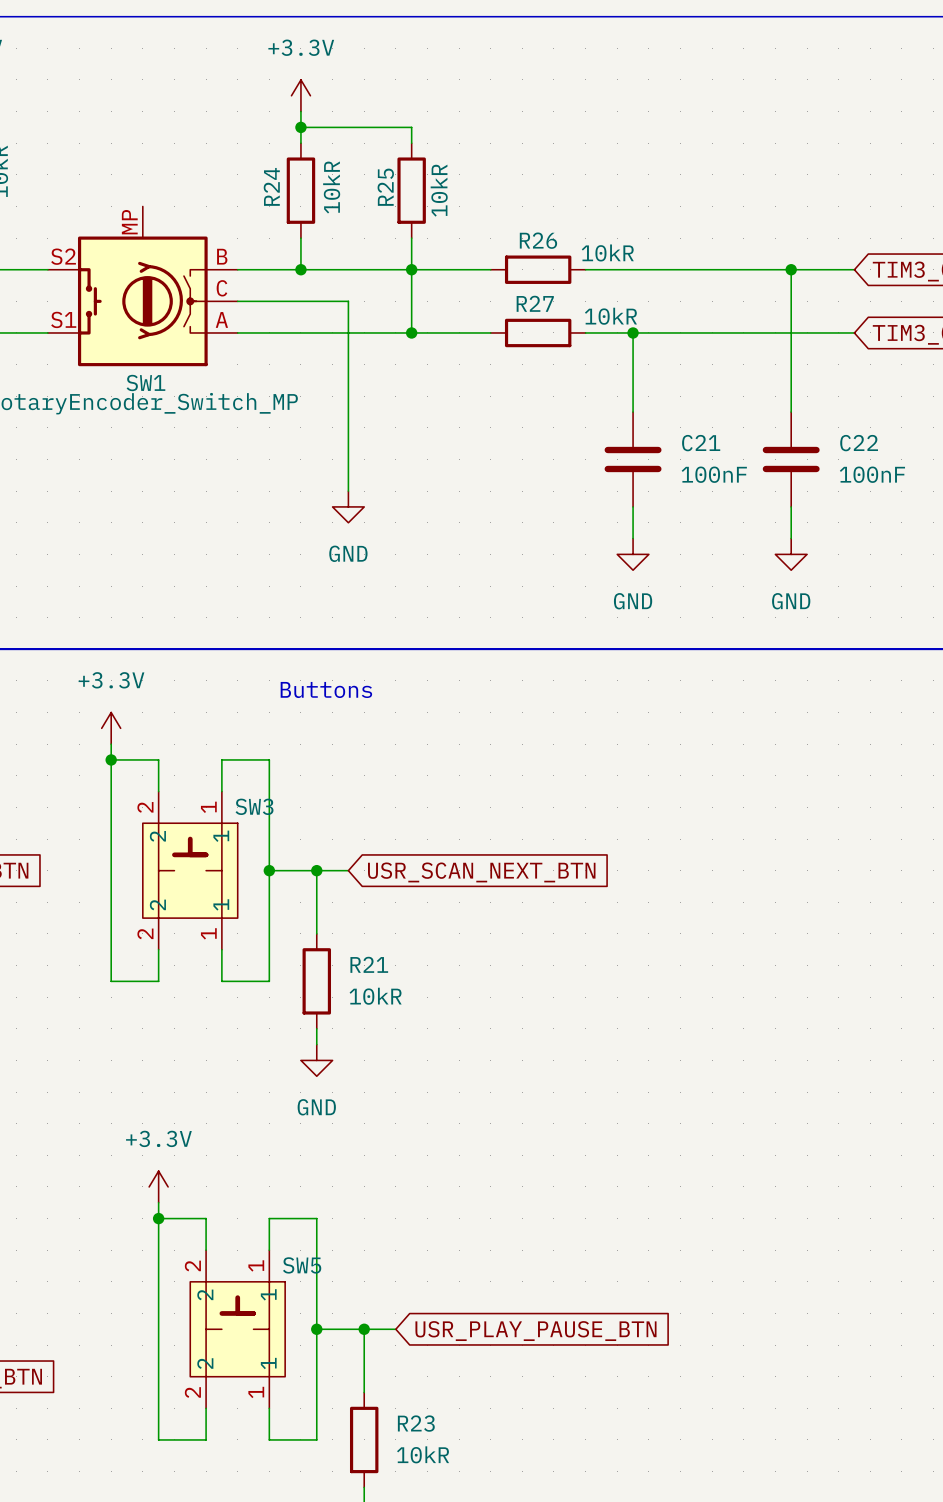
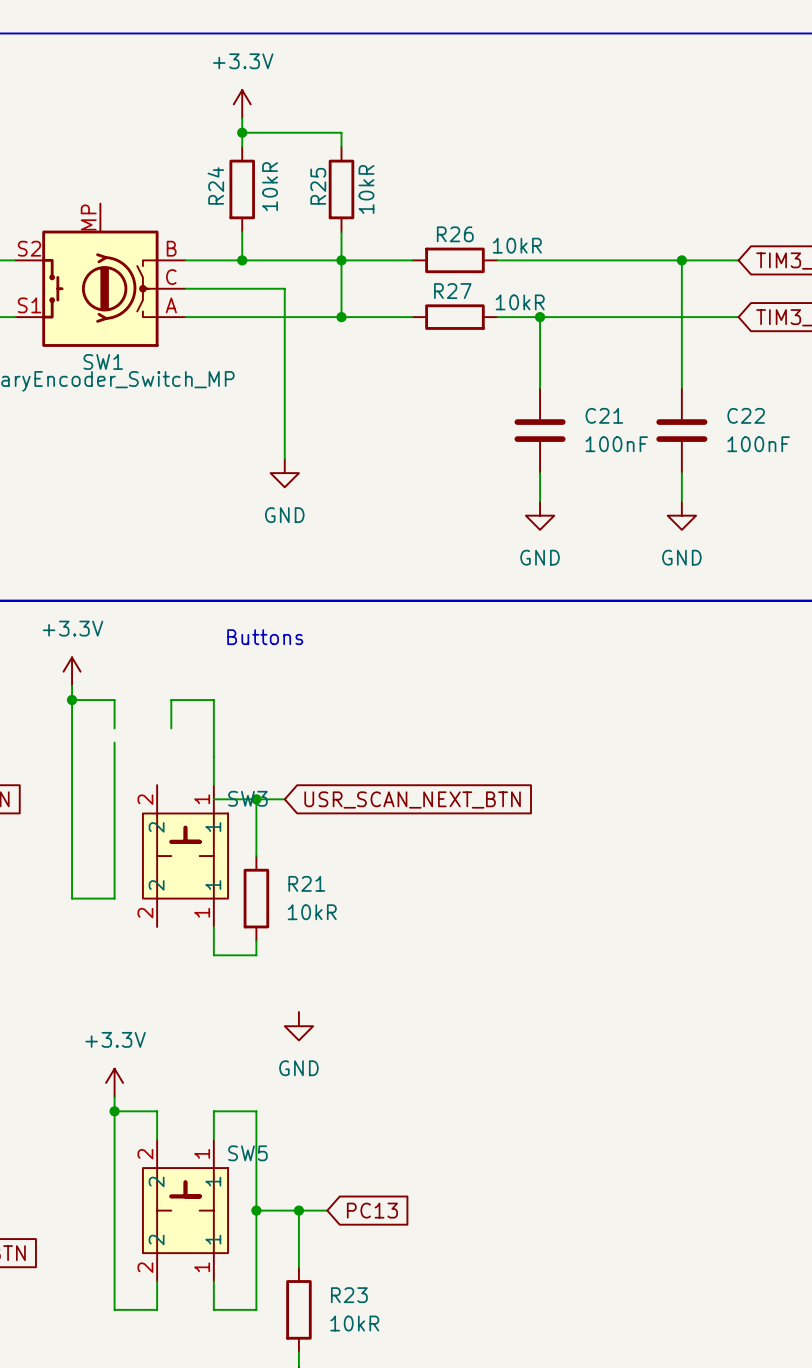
SW3 position: (190, 870) -> (185, 856)
junction: (269, 870) -> none
wire: none -> (213, 926) (213, 955) (256, 955)
power symbol position: GND (316, 1060) -> GND (298, 1026)
global label: USR_PLAY_PAUSE_BTN (535, 1331) -> PC13 (372, 1210)

